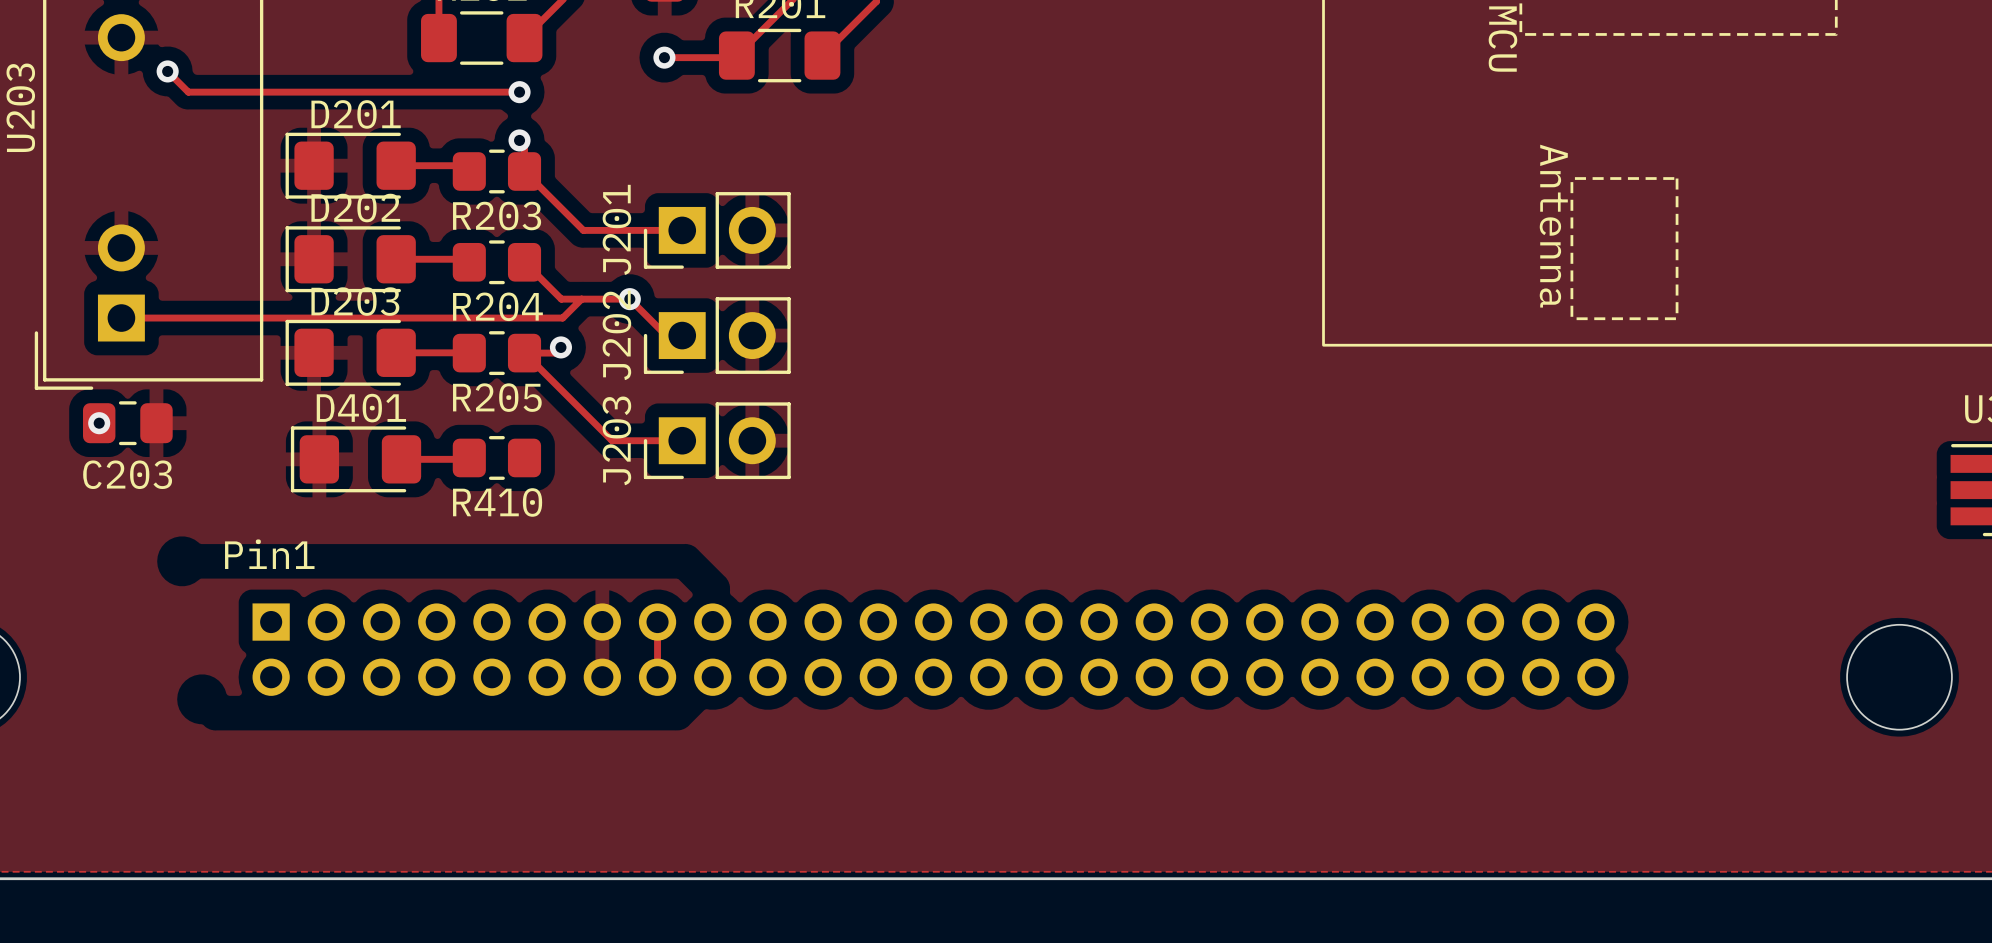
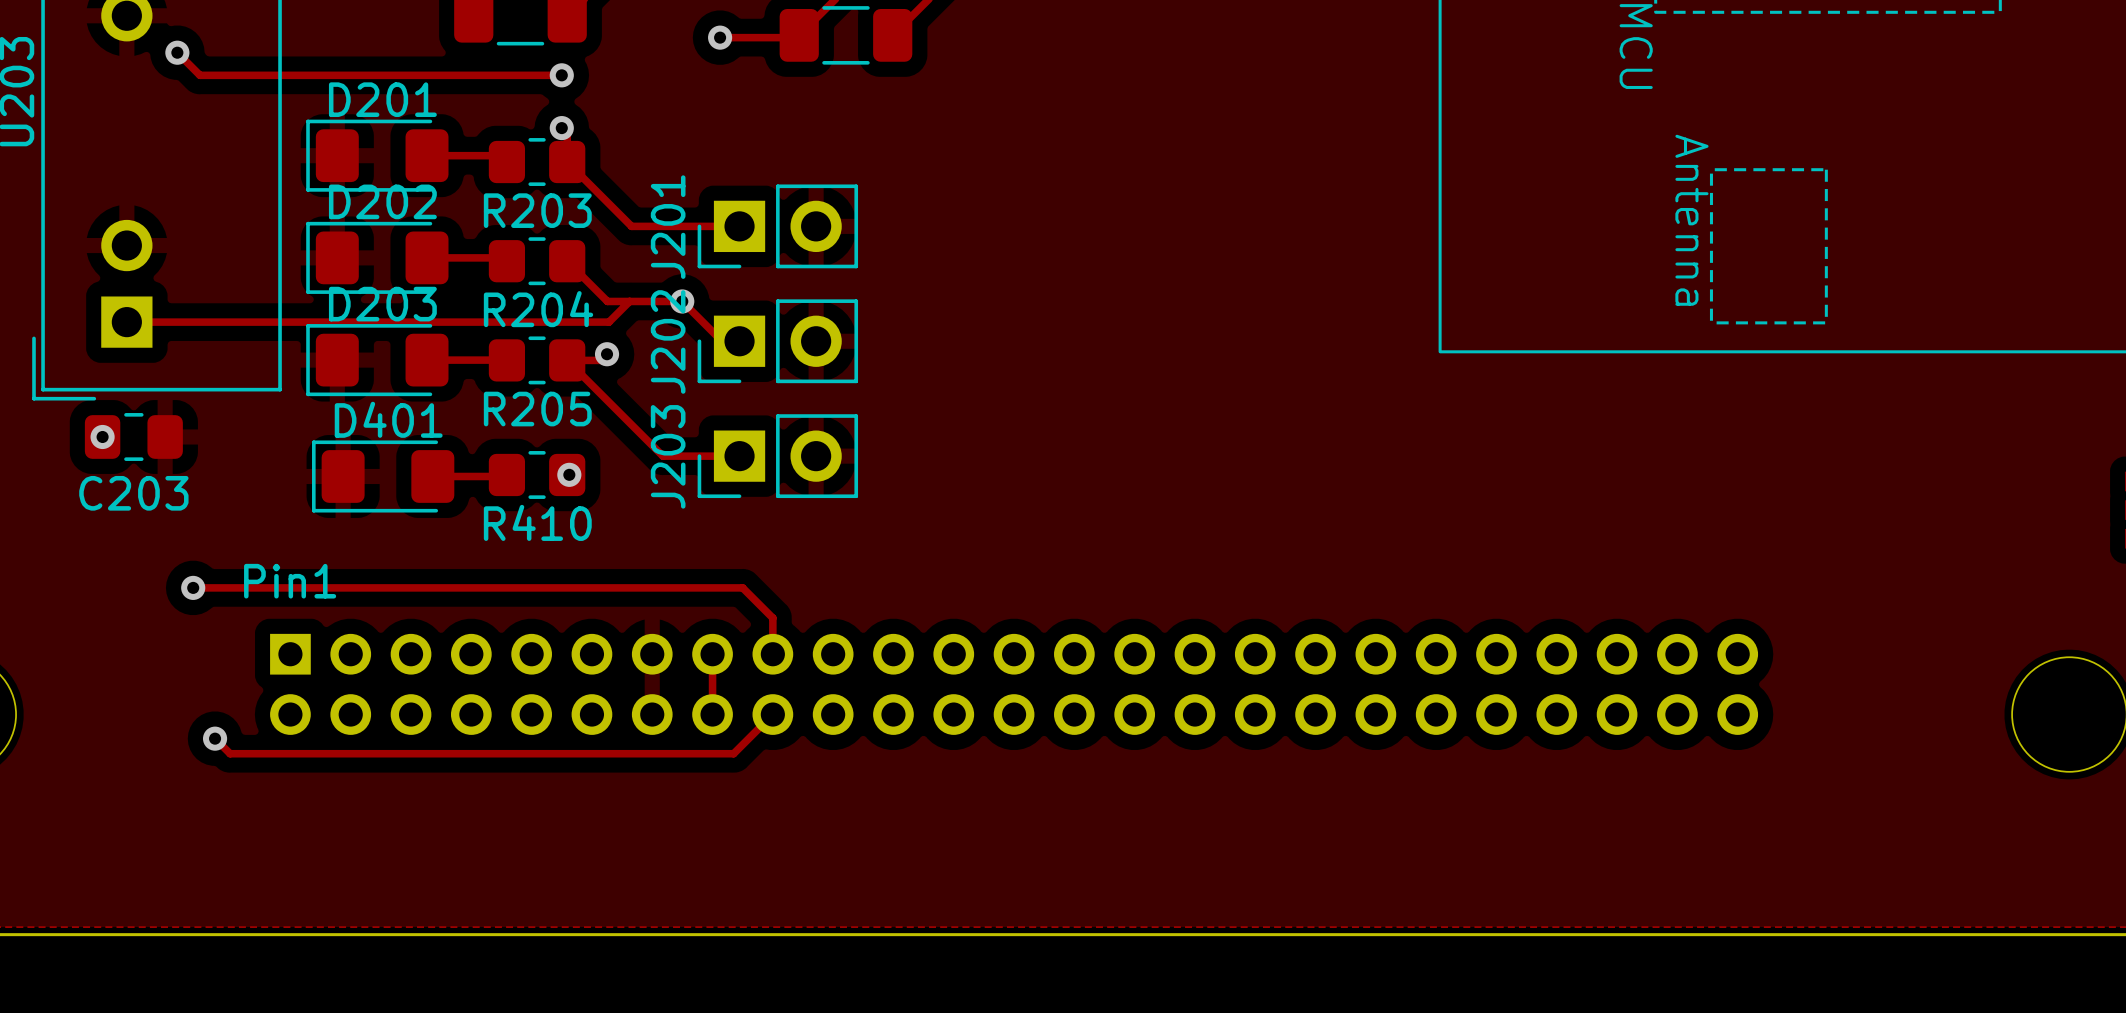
via: none -> (569, 474)
track: none -> (193, 587) (742, 587) (772, 618) (772, 654)
via: none -> (193, 587)
track: none -> (772, 714) (733, 753) (230, 753) (215, 738)
via: none -> (215, 738)

